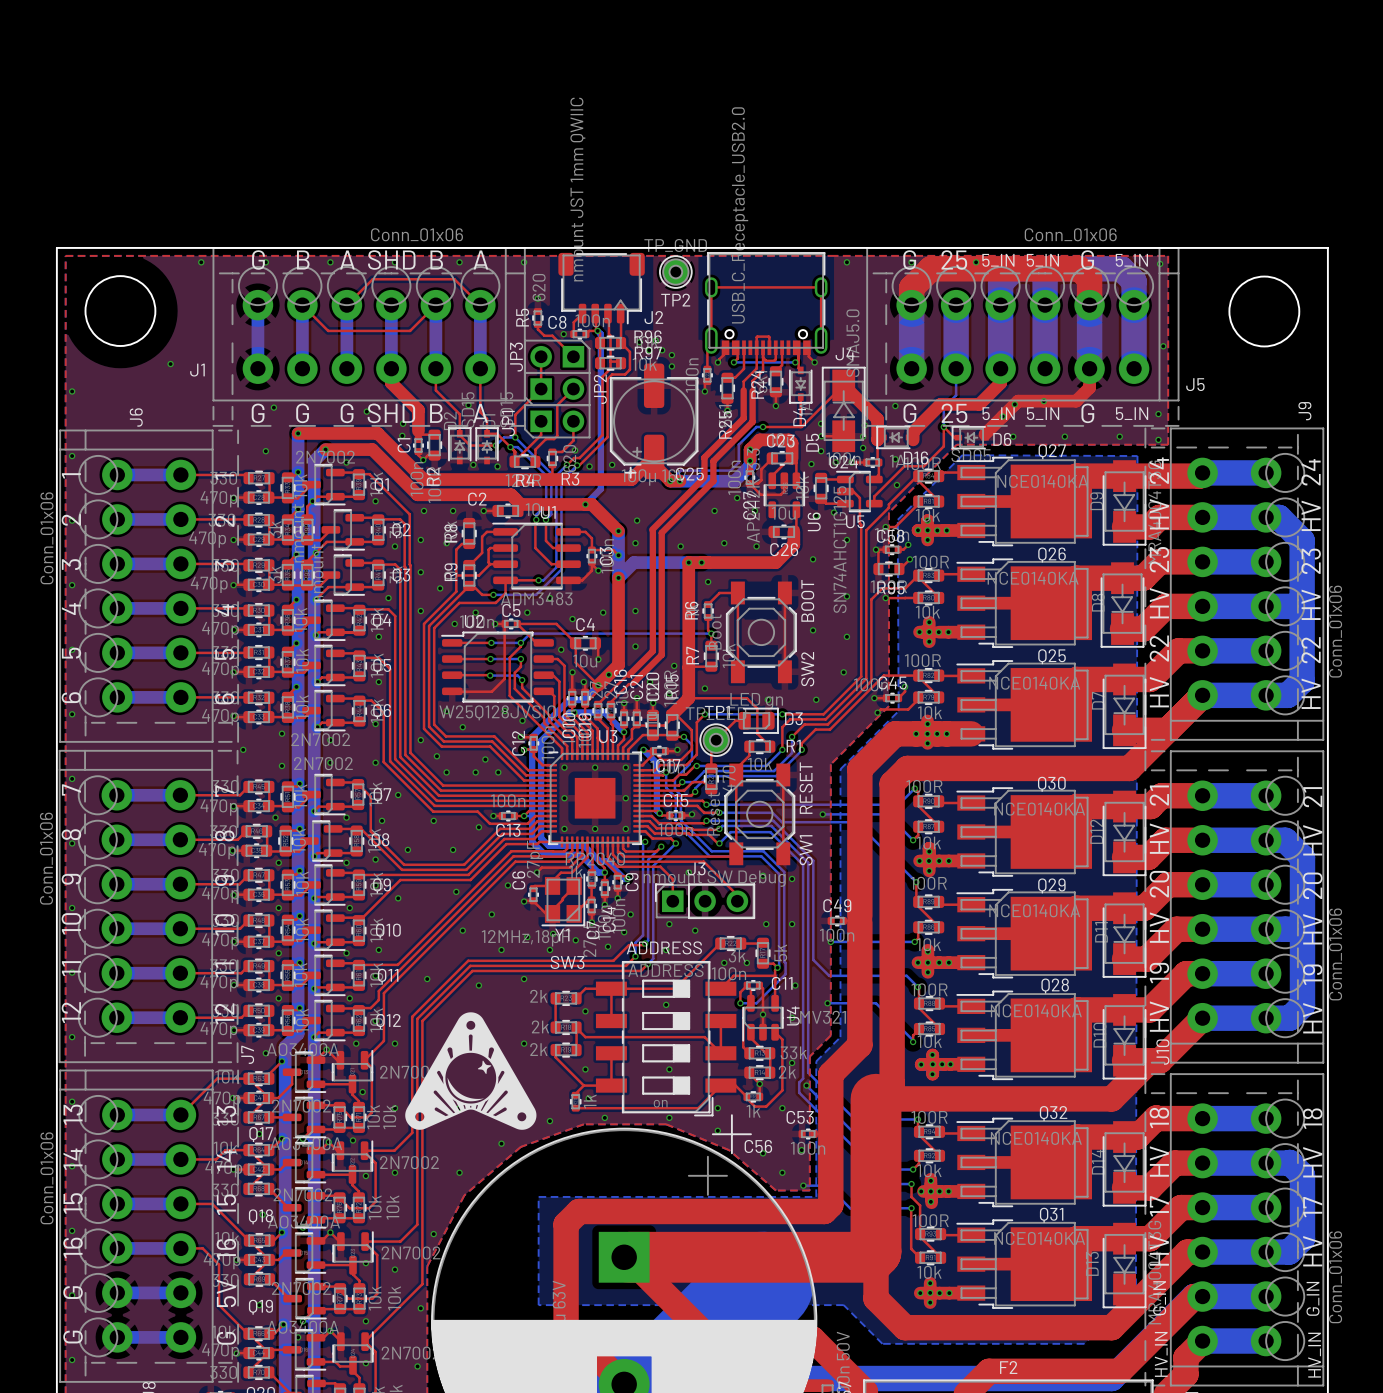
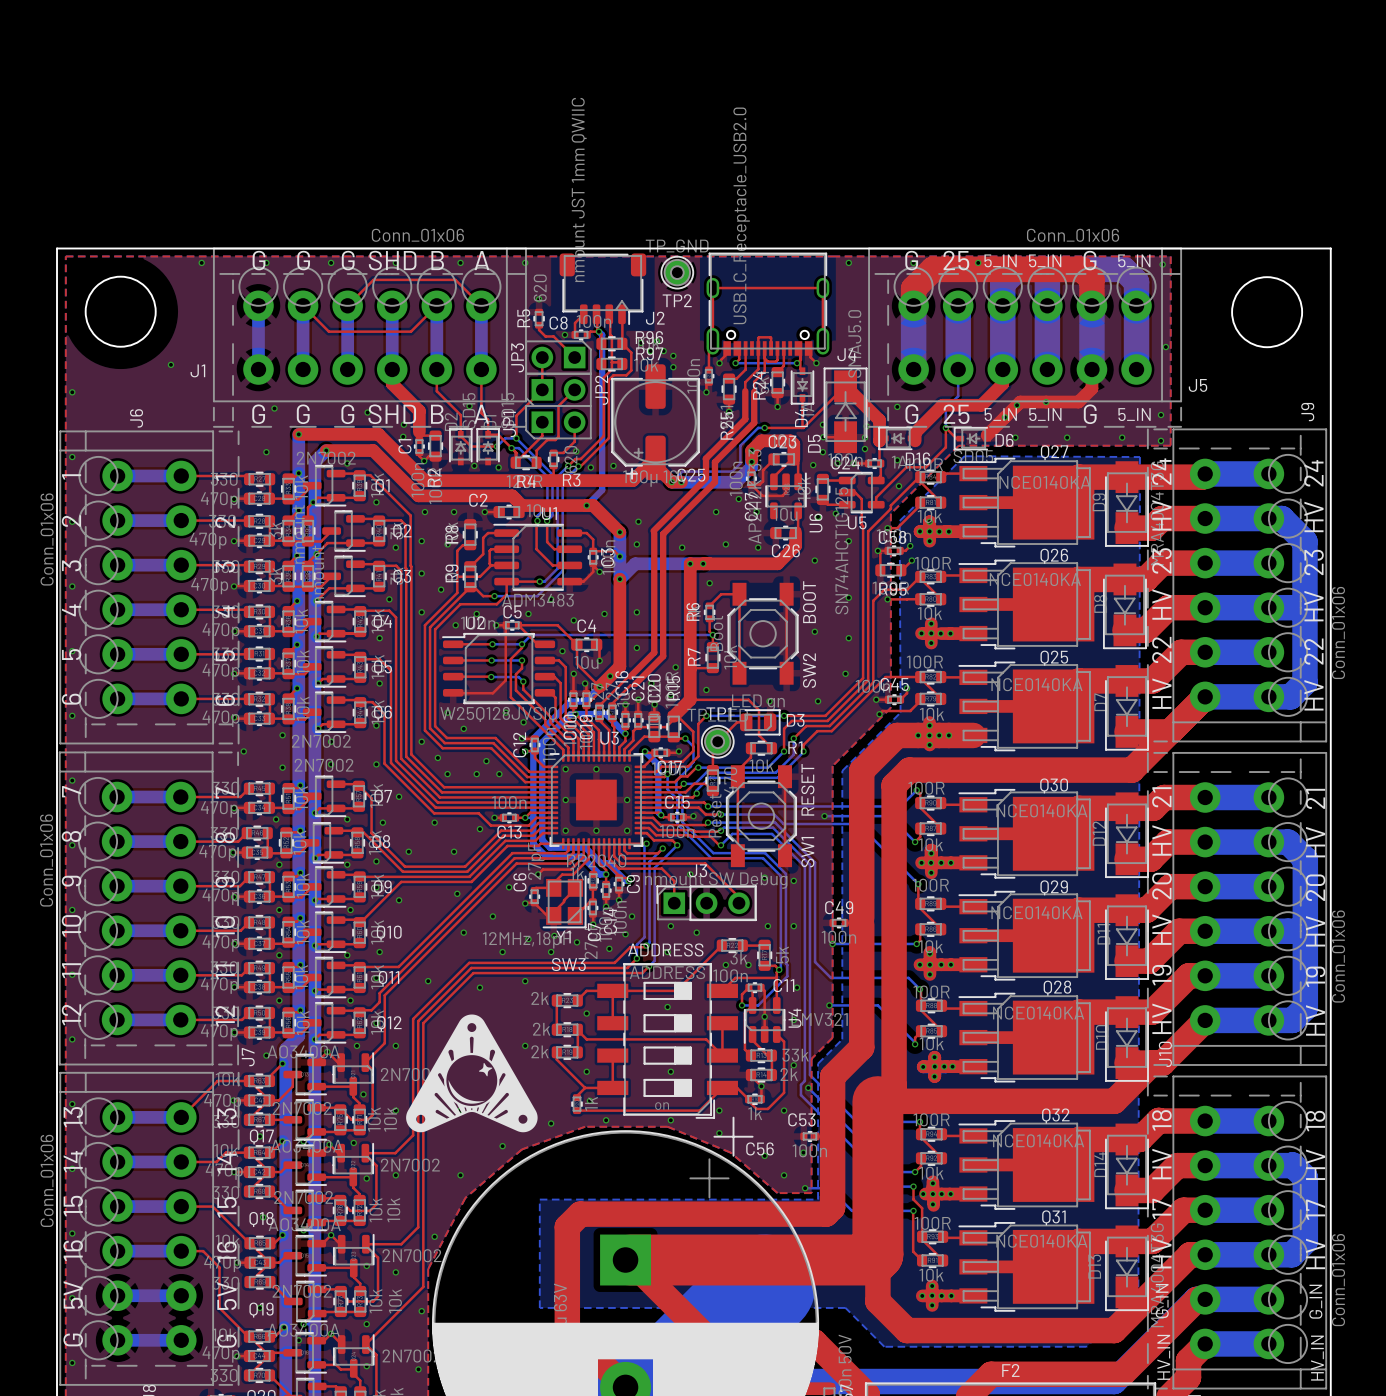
text: B (303, 260) -> G (303, 260)
text: A (347, 260) -> G (348, 260)
text: G (73, 1292) -> 5V (73, 1294)

